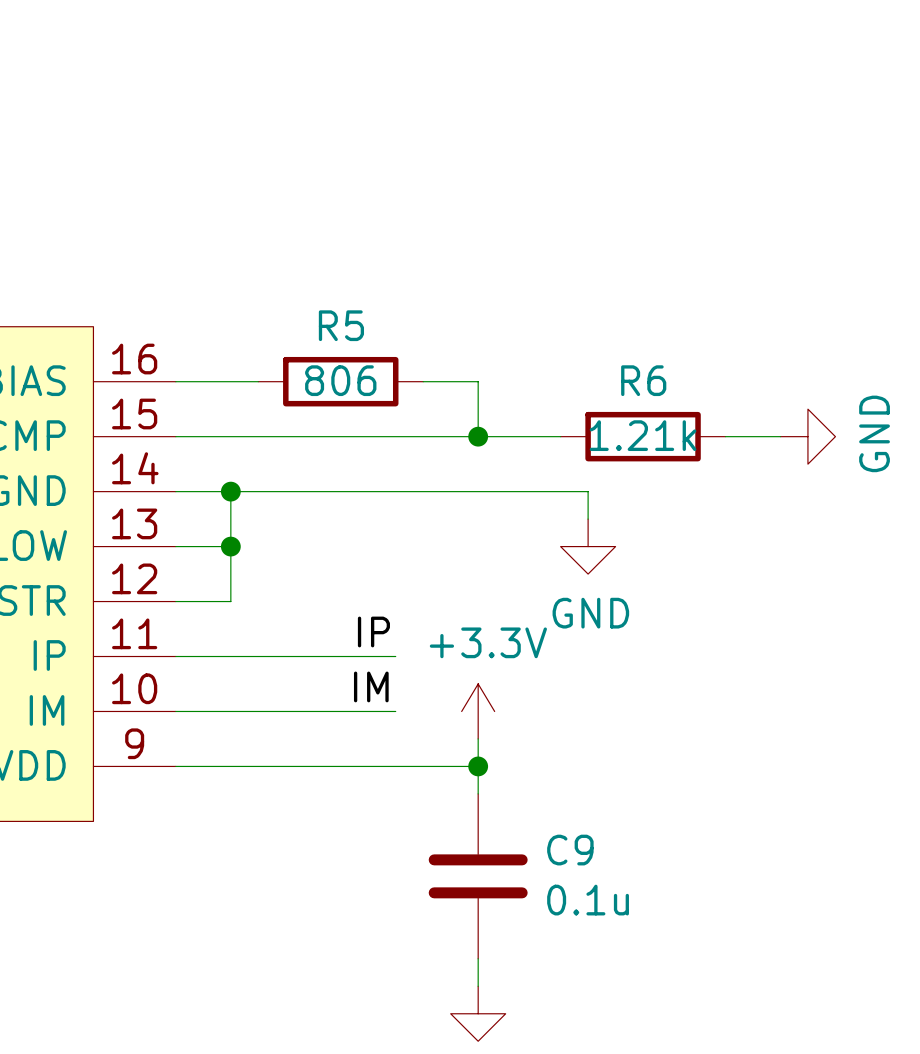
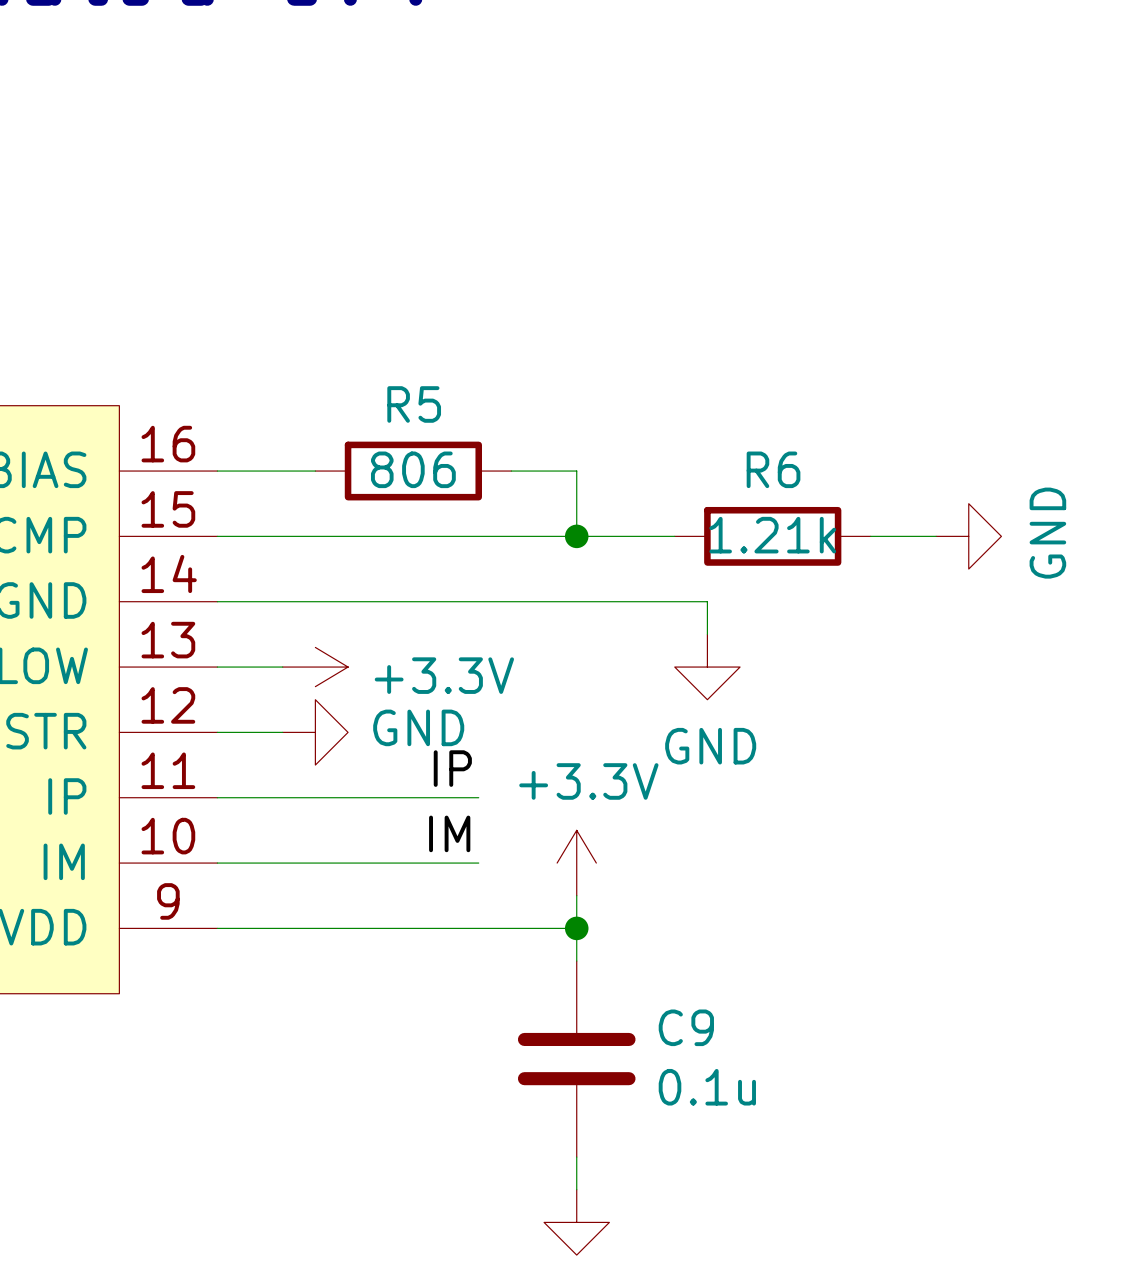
wire: (230, 491) (230, 601) -> none
junction: (230, 491) -> none
junction: (230, 546) -> none
power symbol: none -> +3.3V (315, 667)
power symbol: none -> GND (315, 732)

